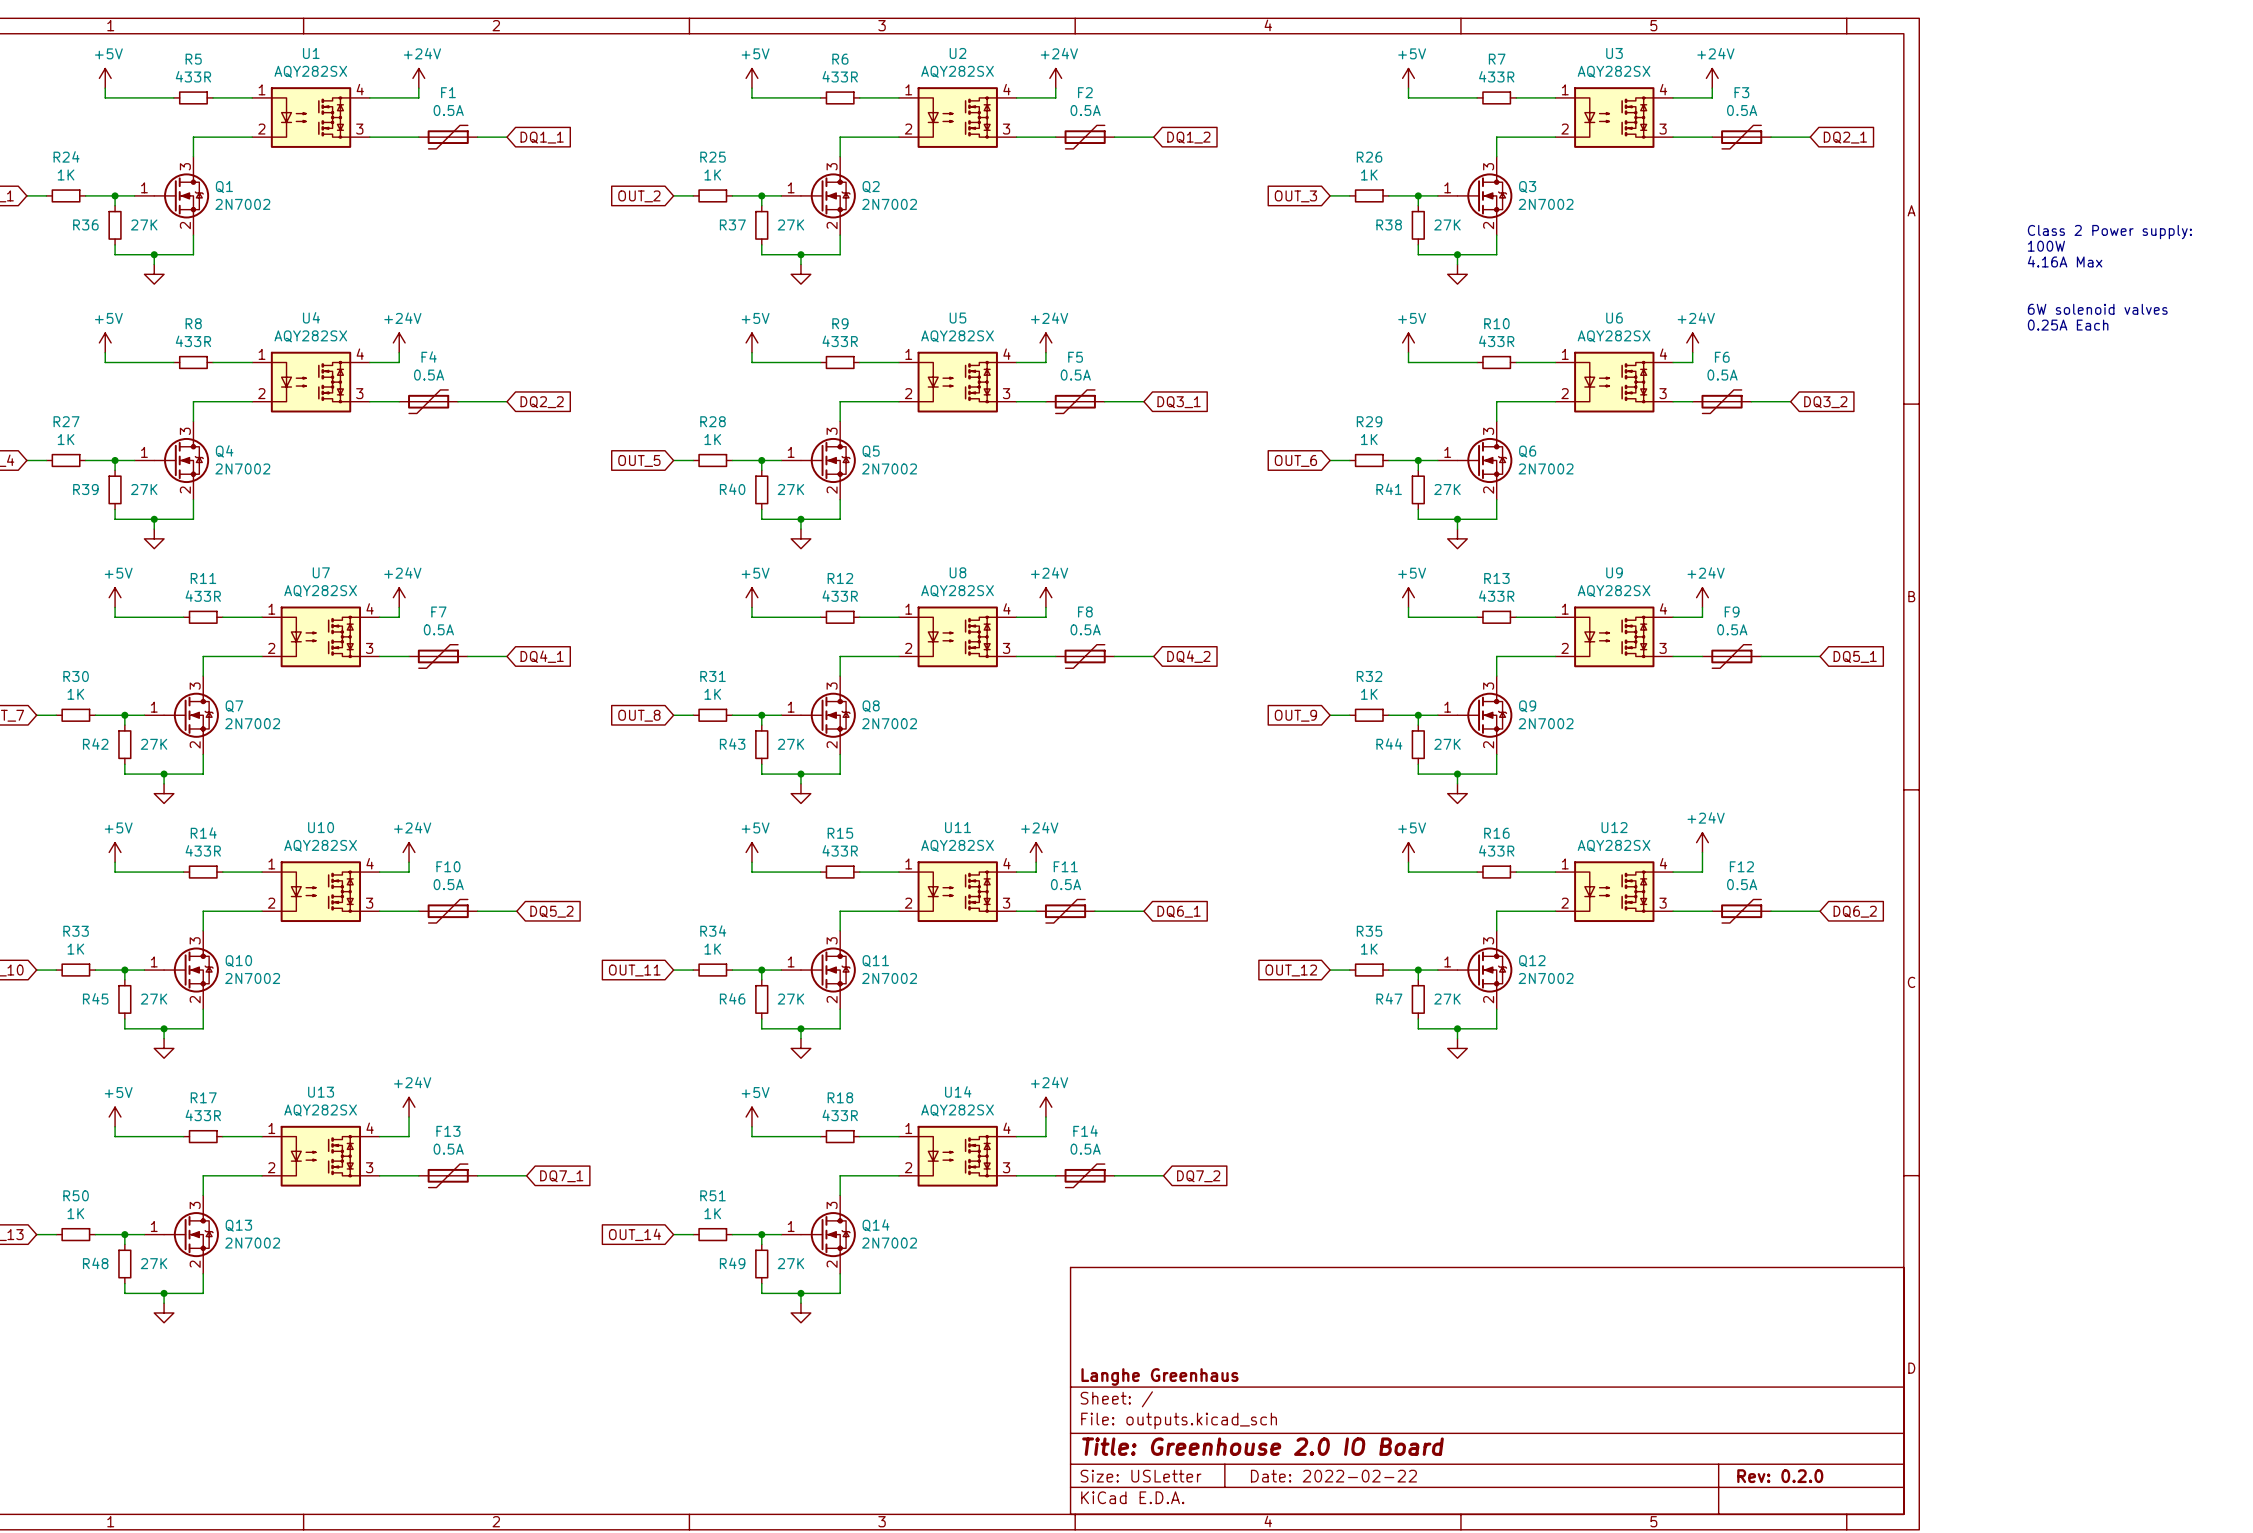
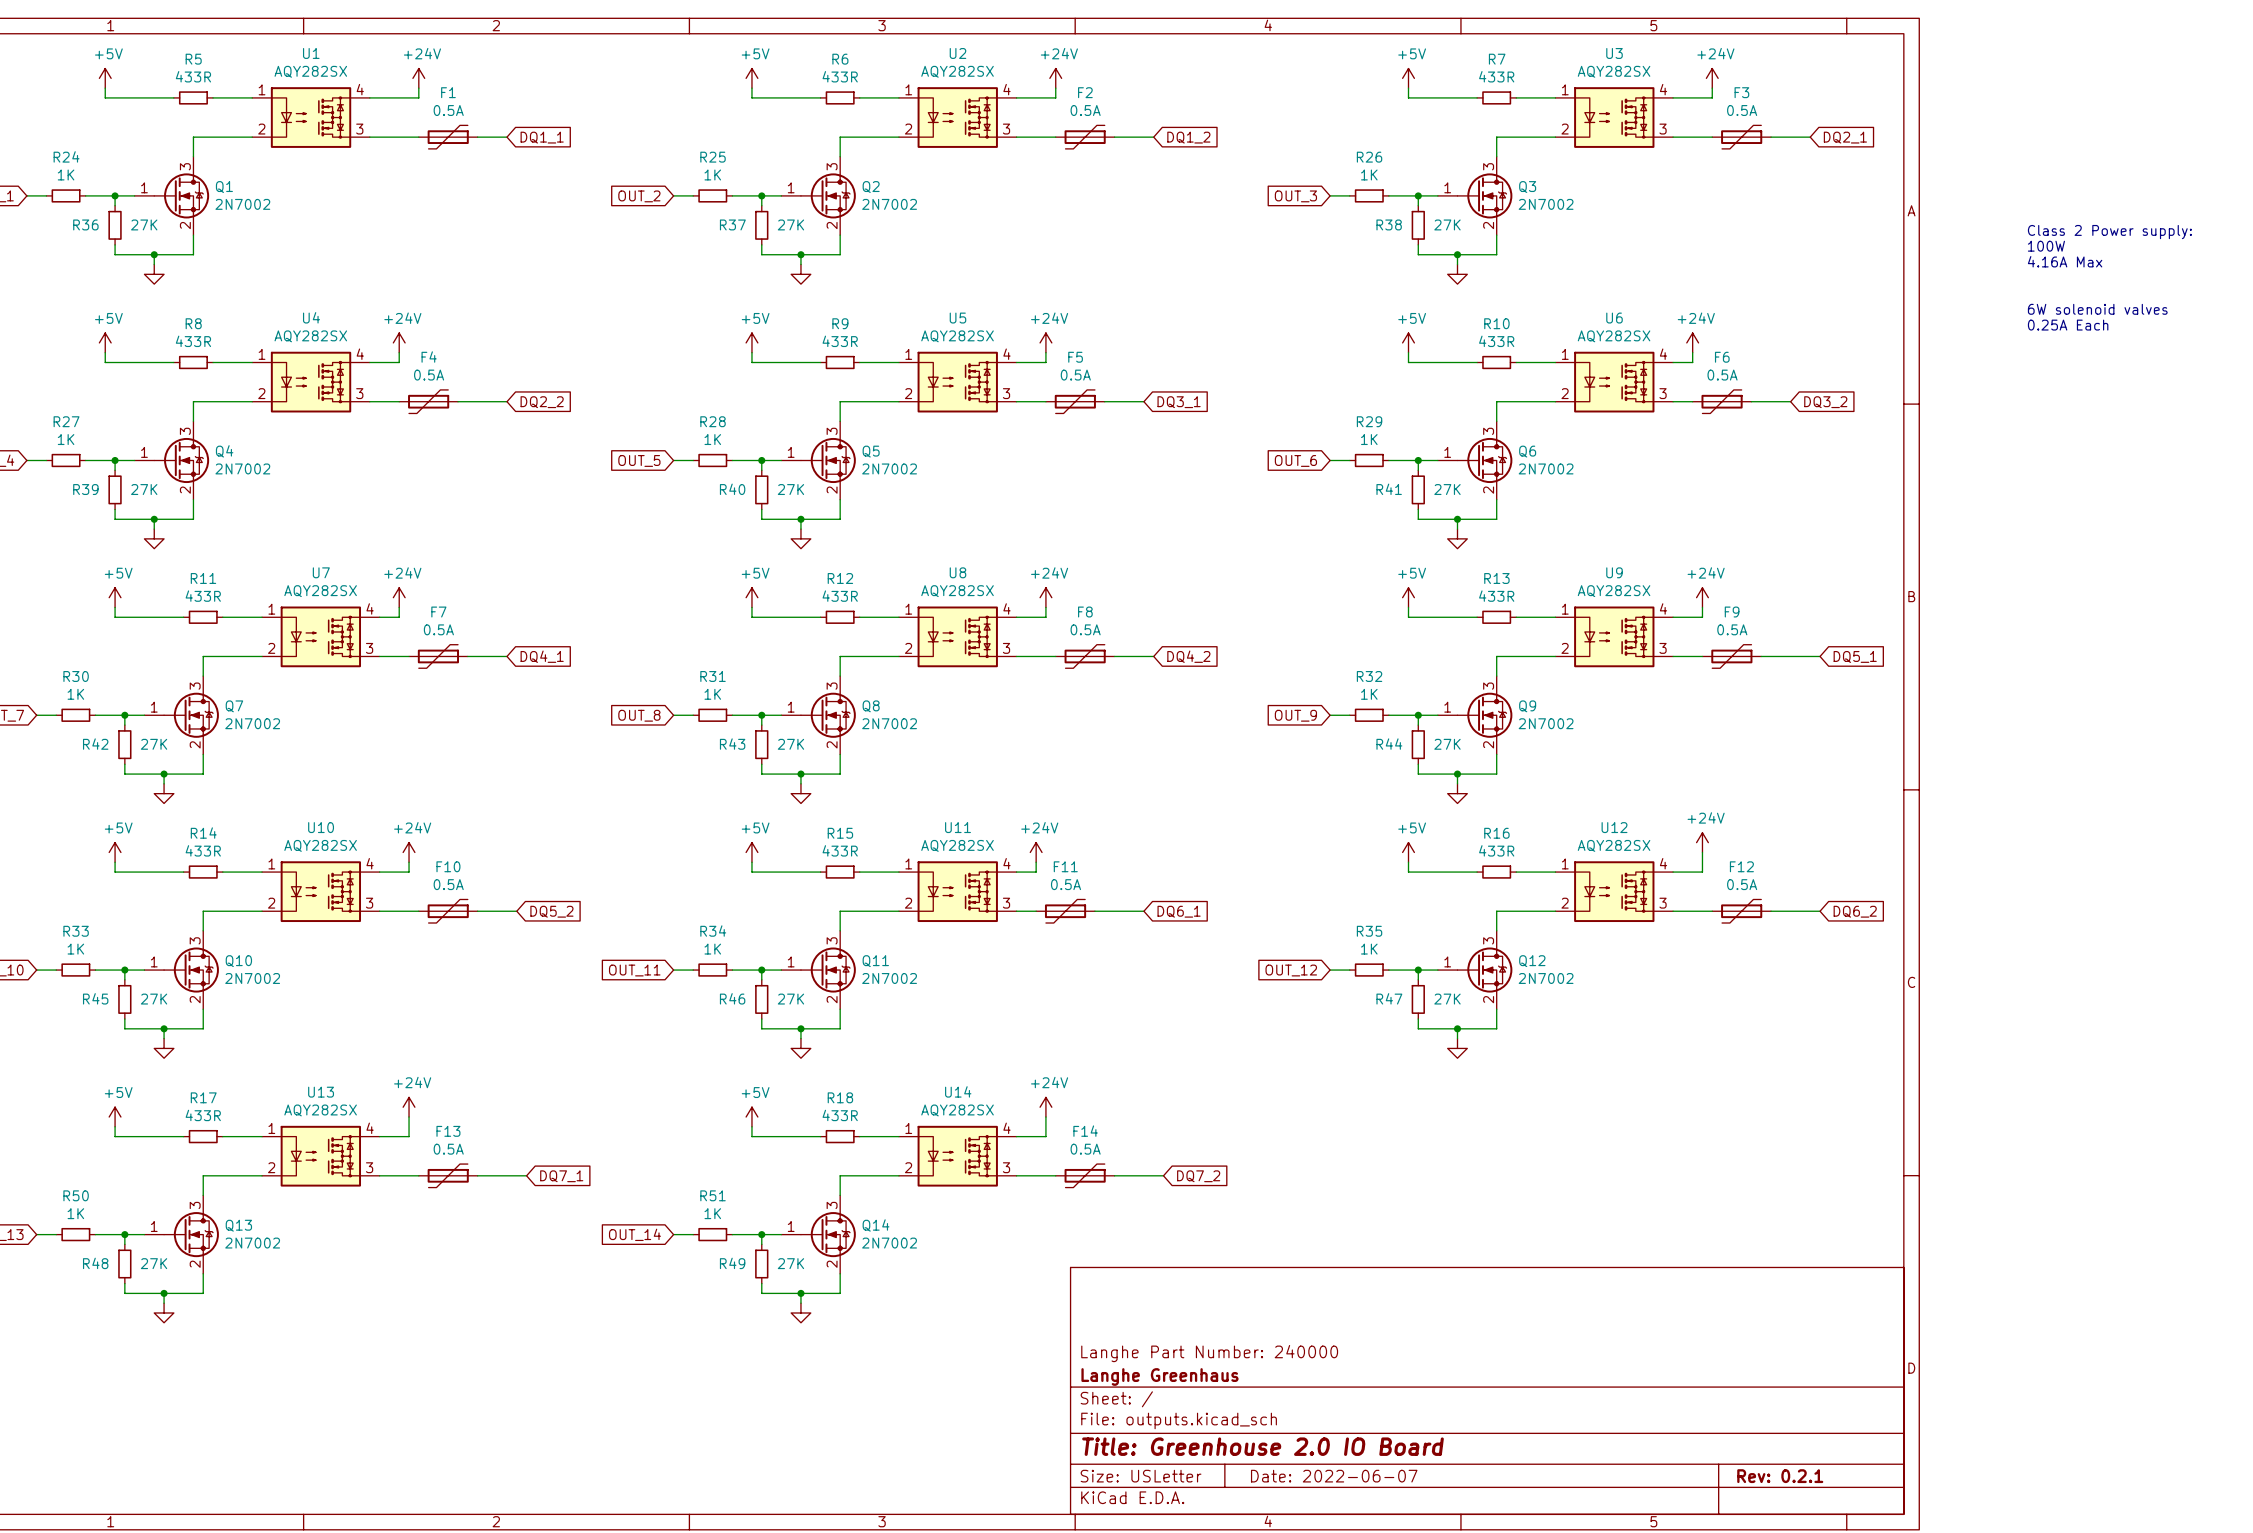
title block: none -> Langhe Part Number: 240000 (1209, 1353)
title block: Date: 2022-02-22 (1333, 1476) -> Date: 2022-06-07 (1334, 1476)
title block: Rev: 0.2.0 (1780, 1476) -> Rev: 0.2.1 (1780, 1476)

